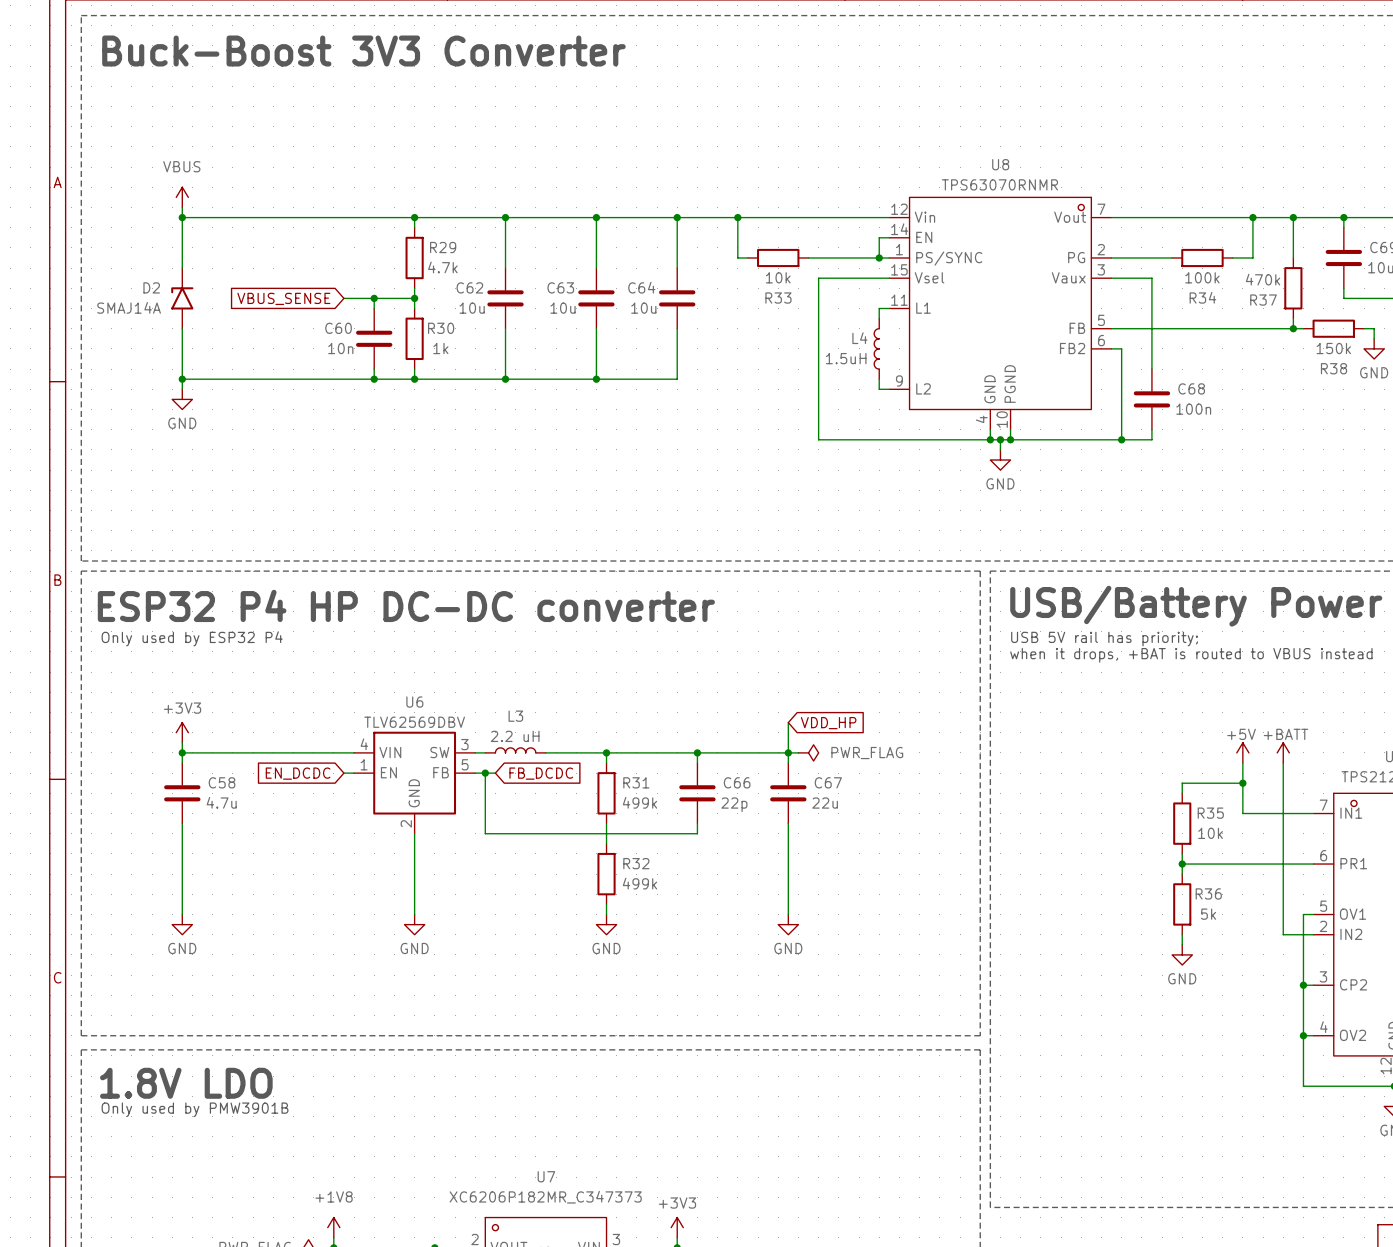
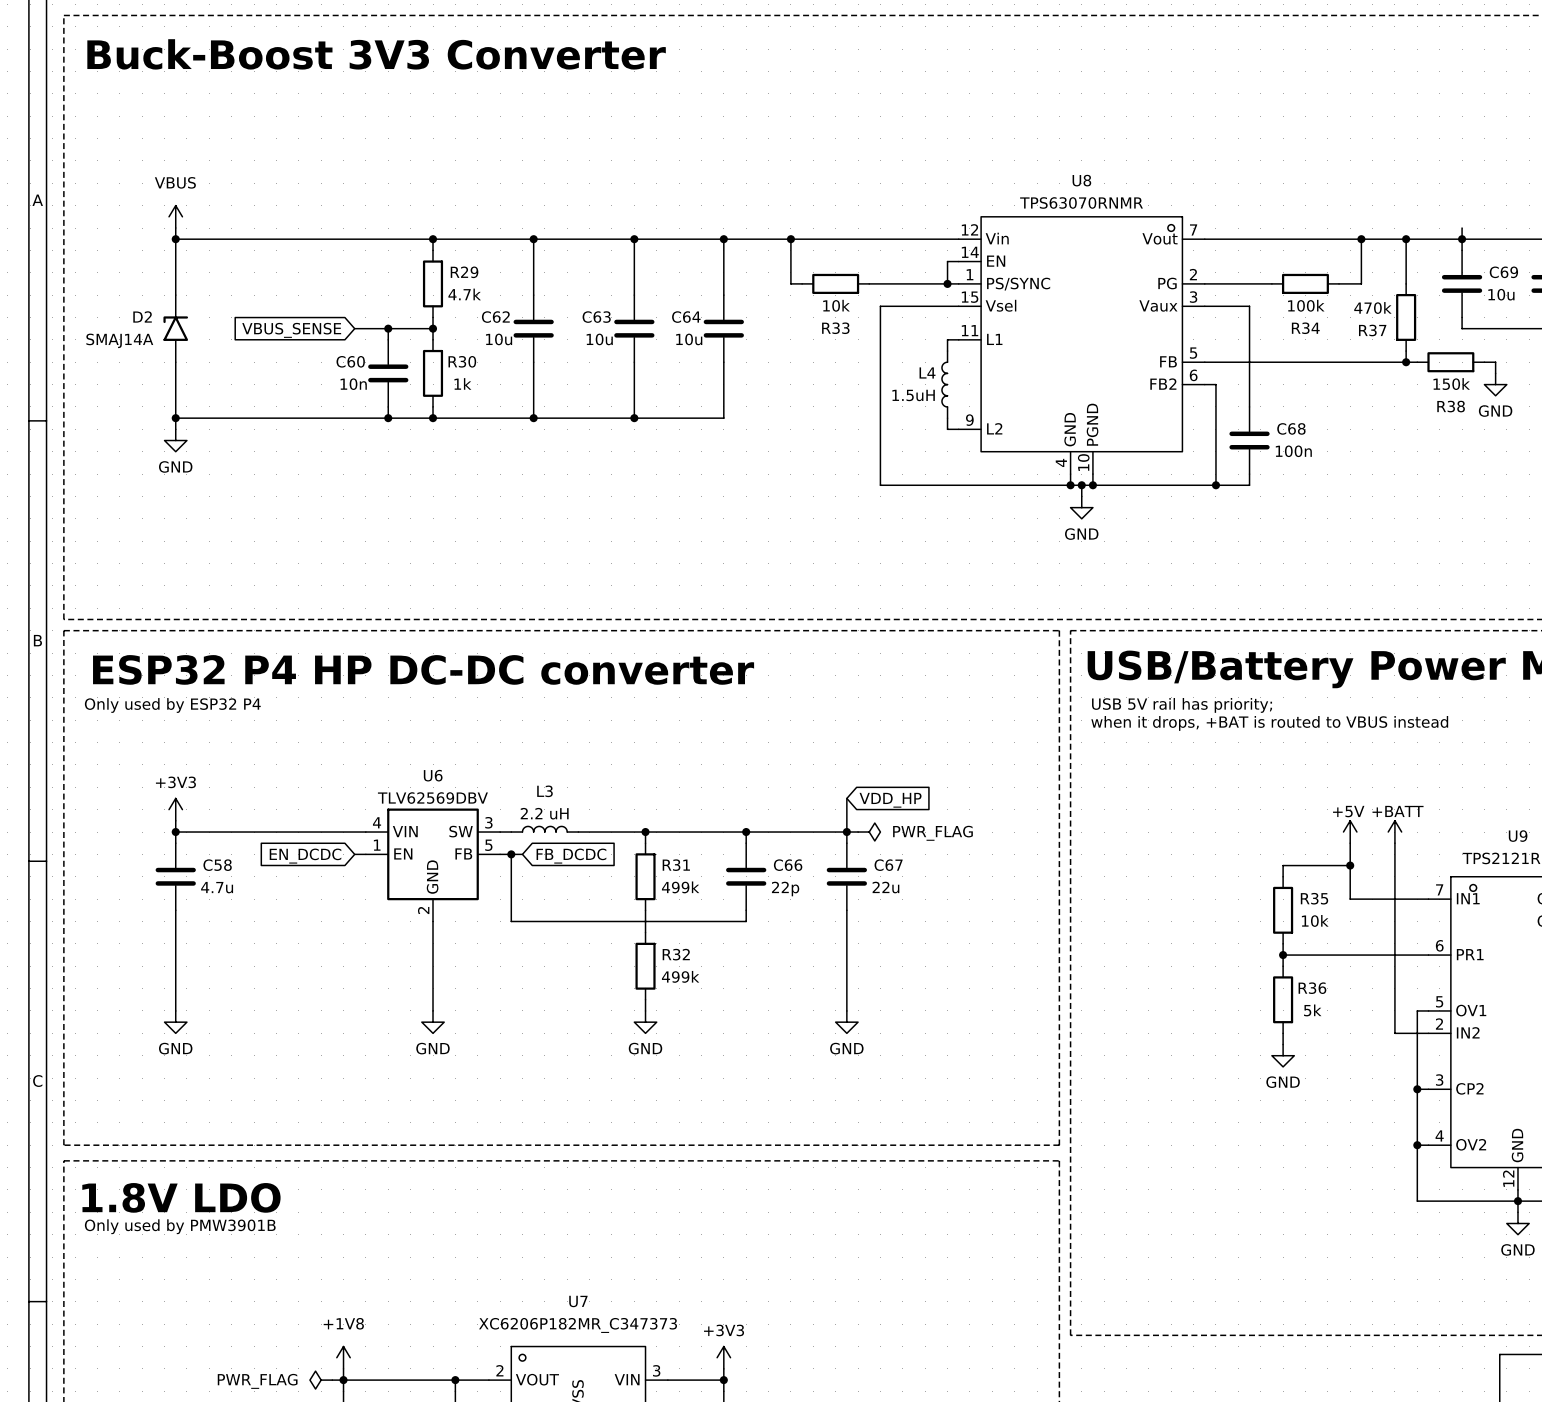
wire: none -> (1462, 228) (1462, 239)

